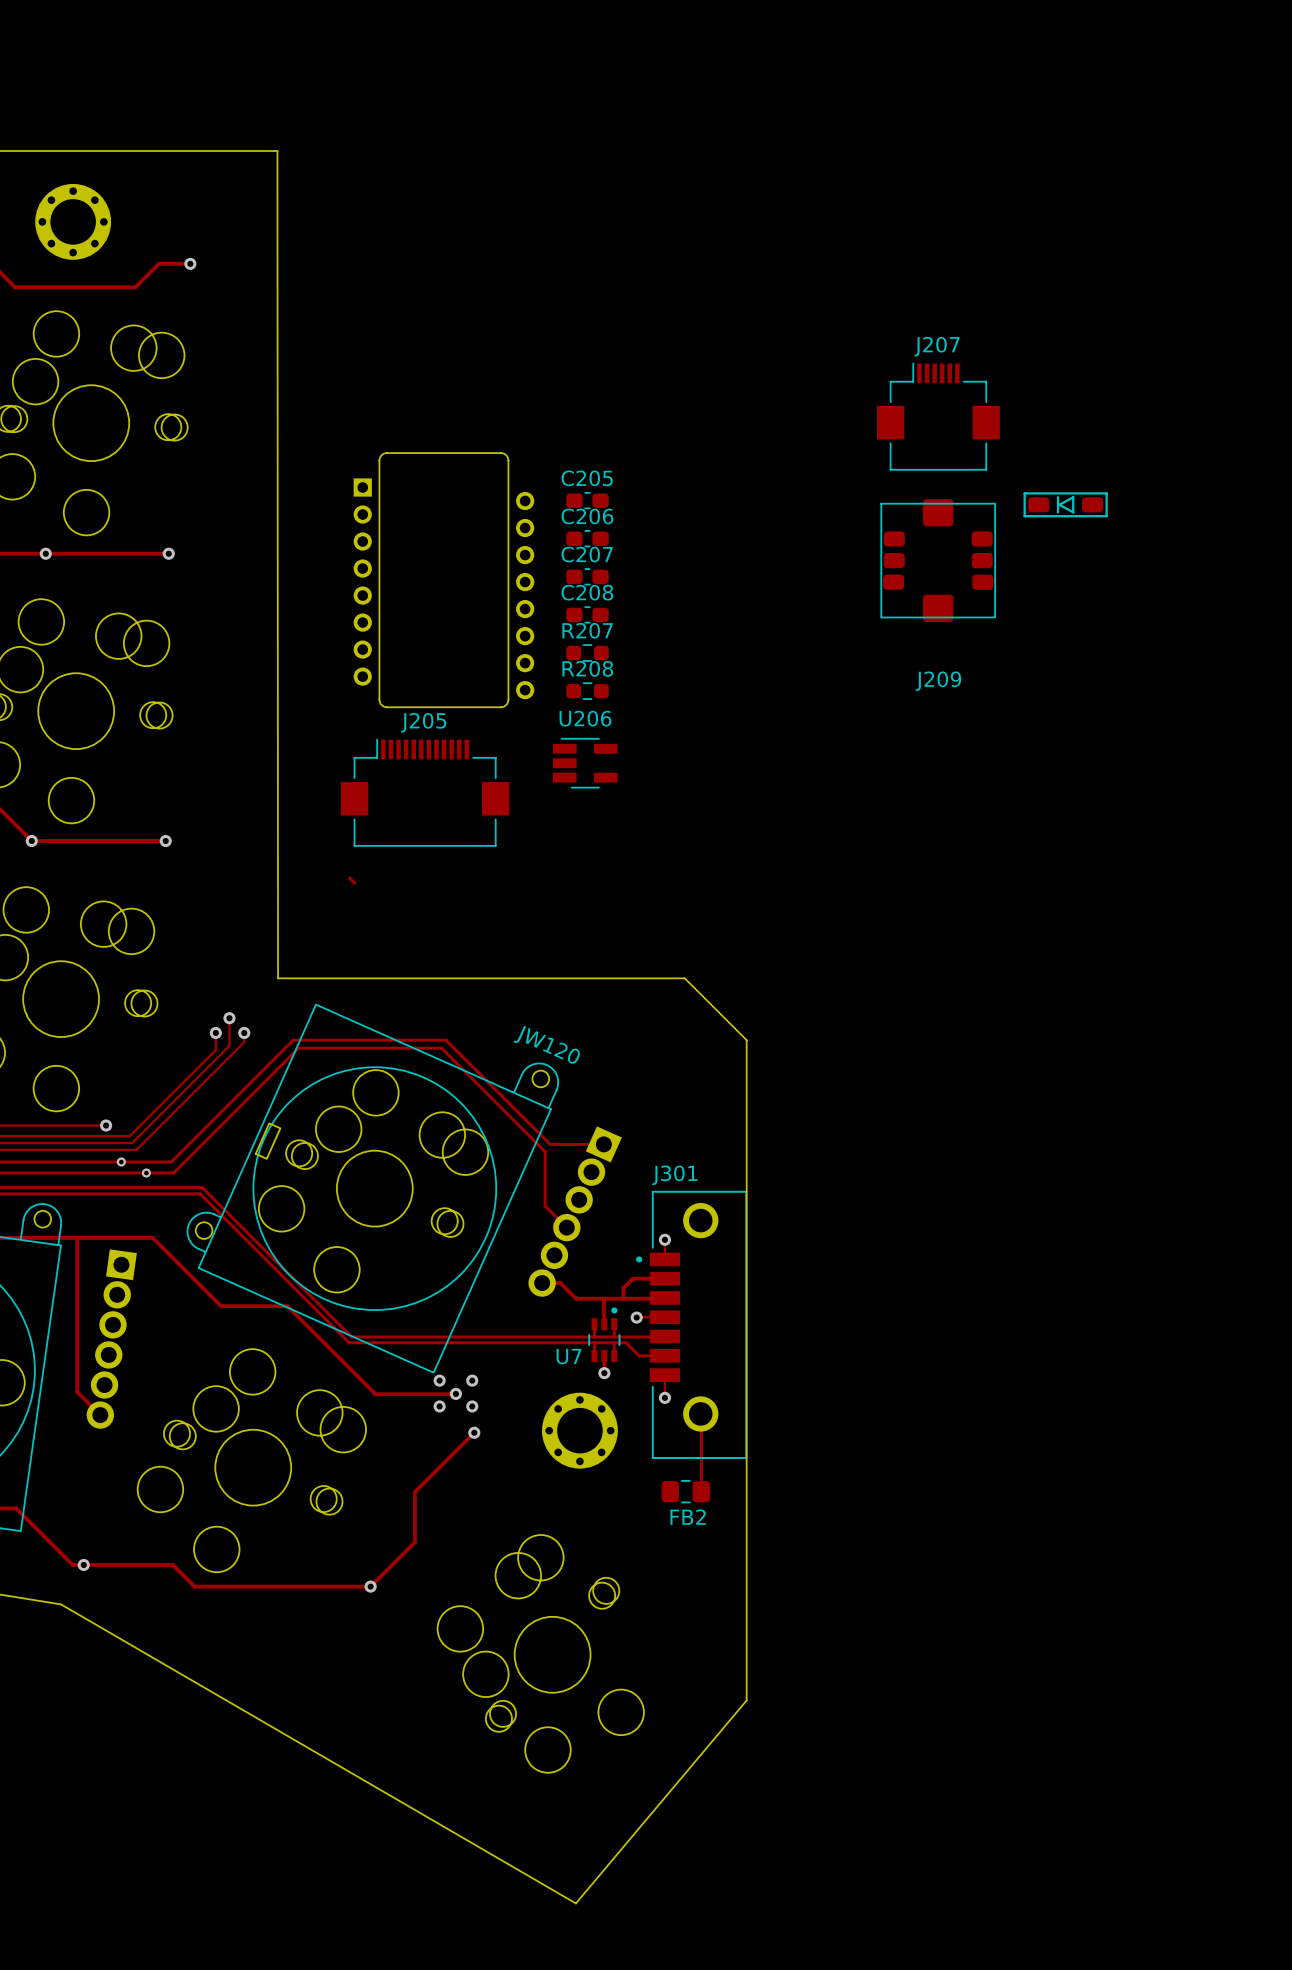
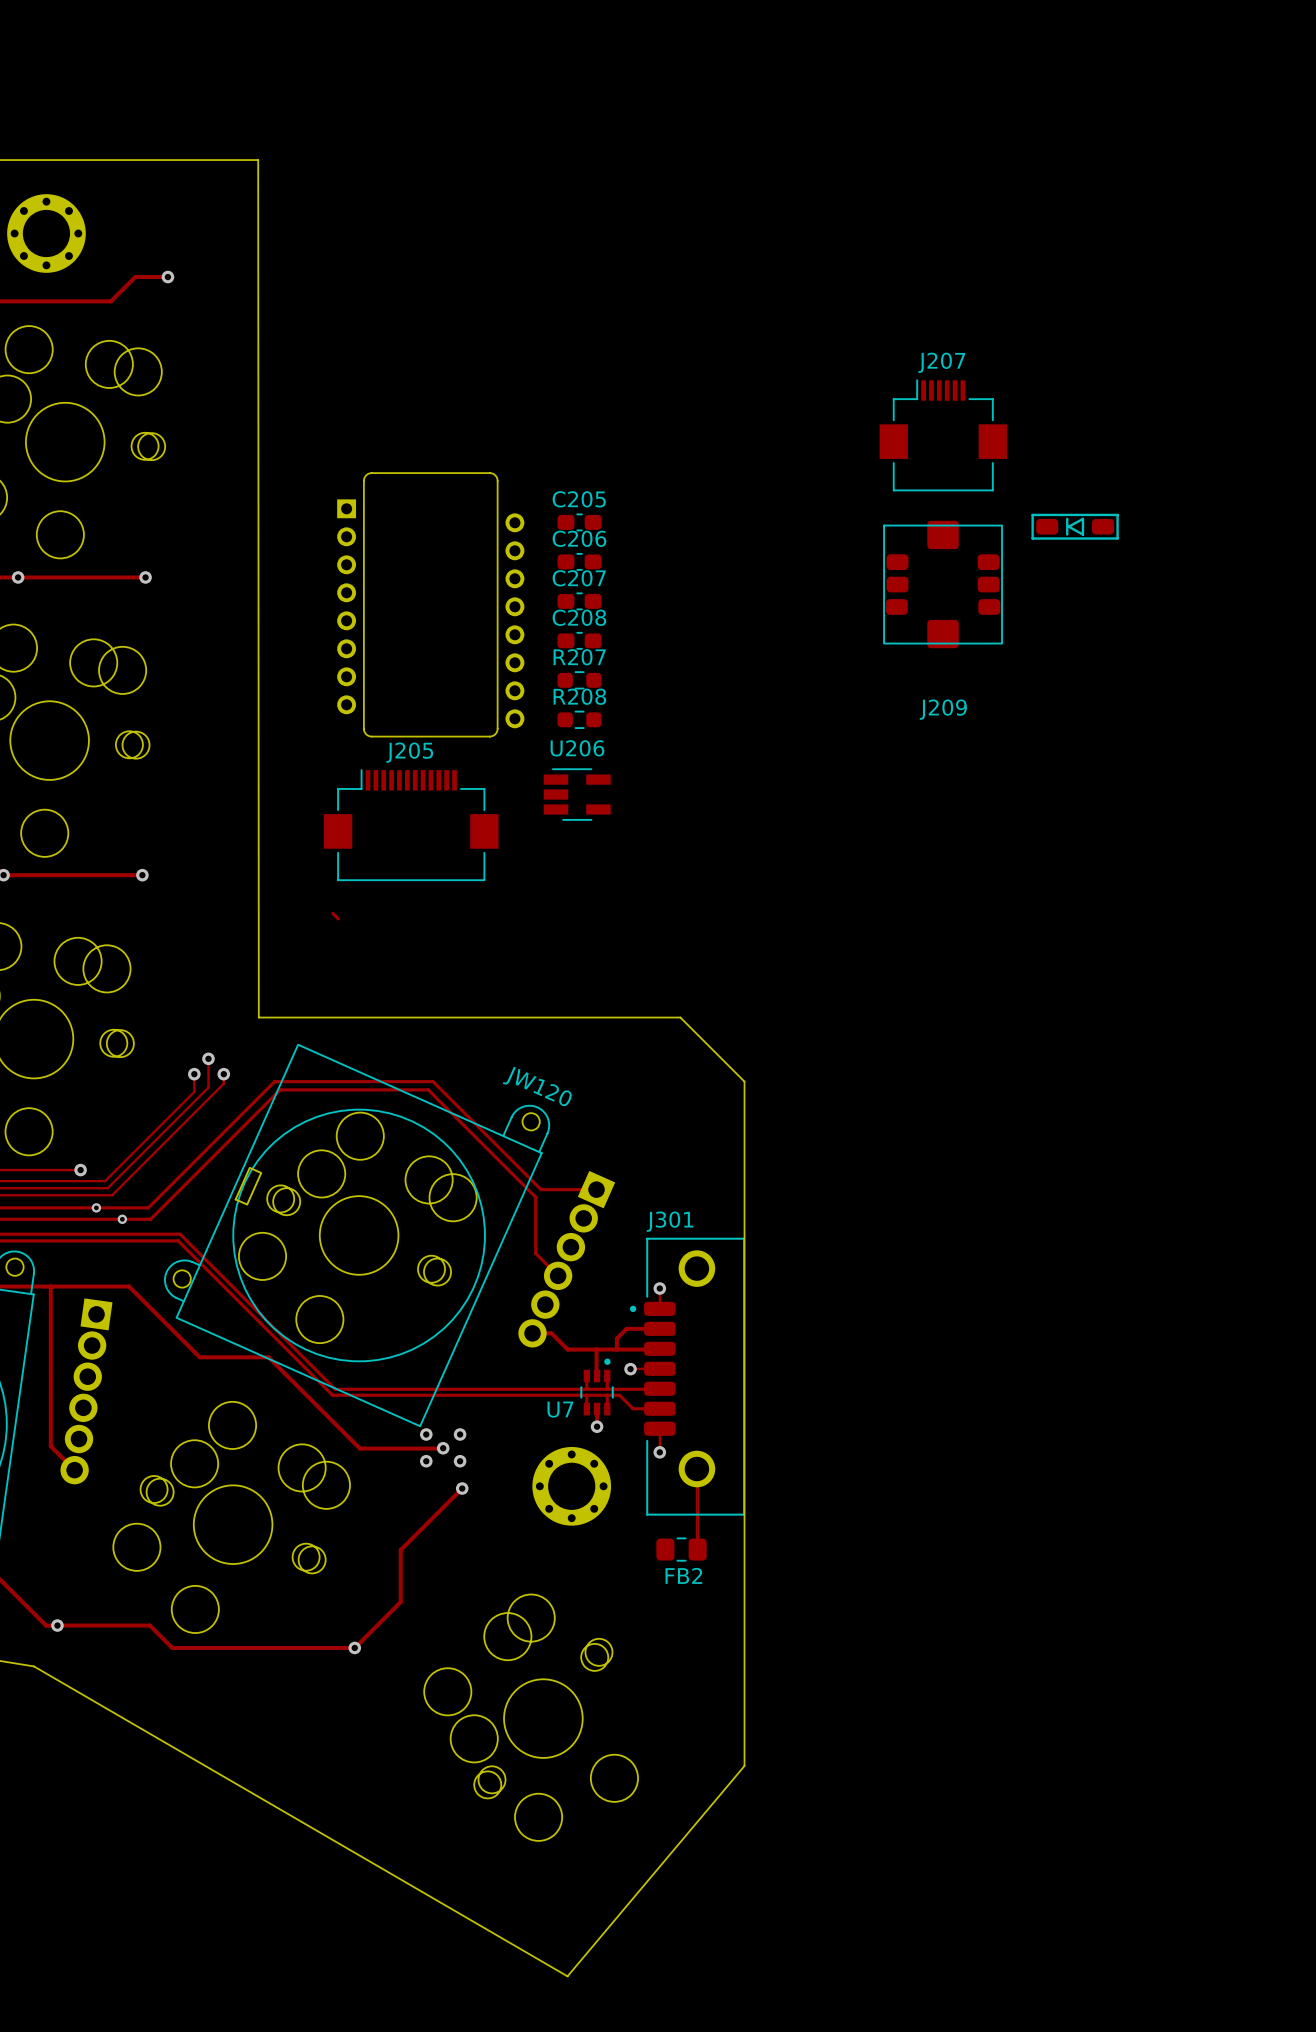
J301 footprint: [636, 1190, 748, 1459] -> [629, 1237, 746, 1516]

